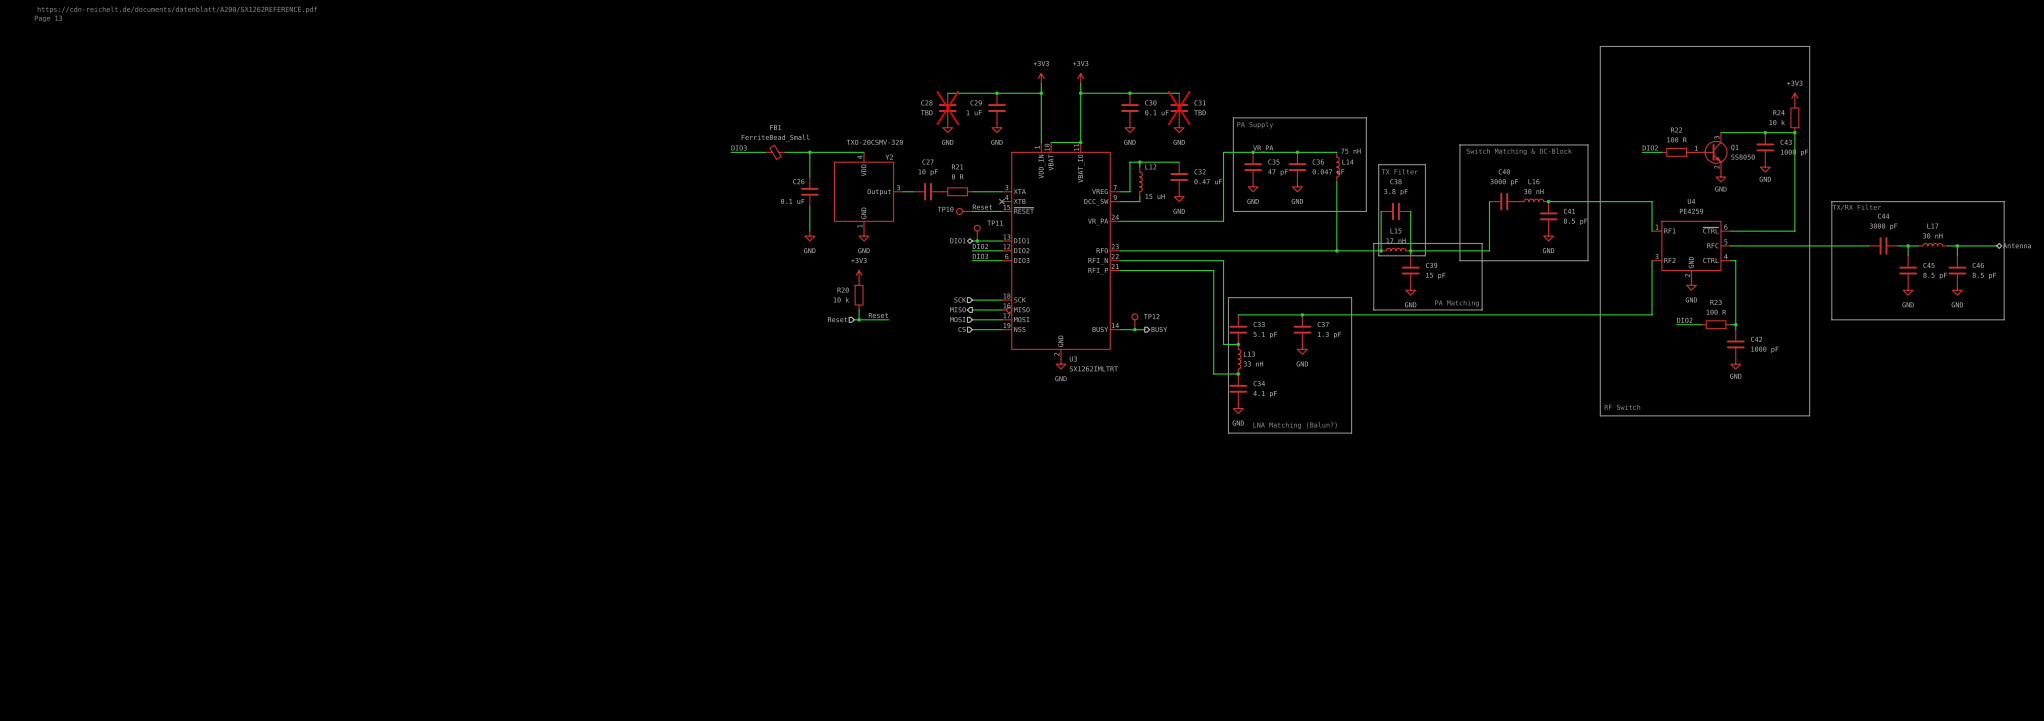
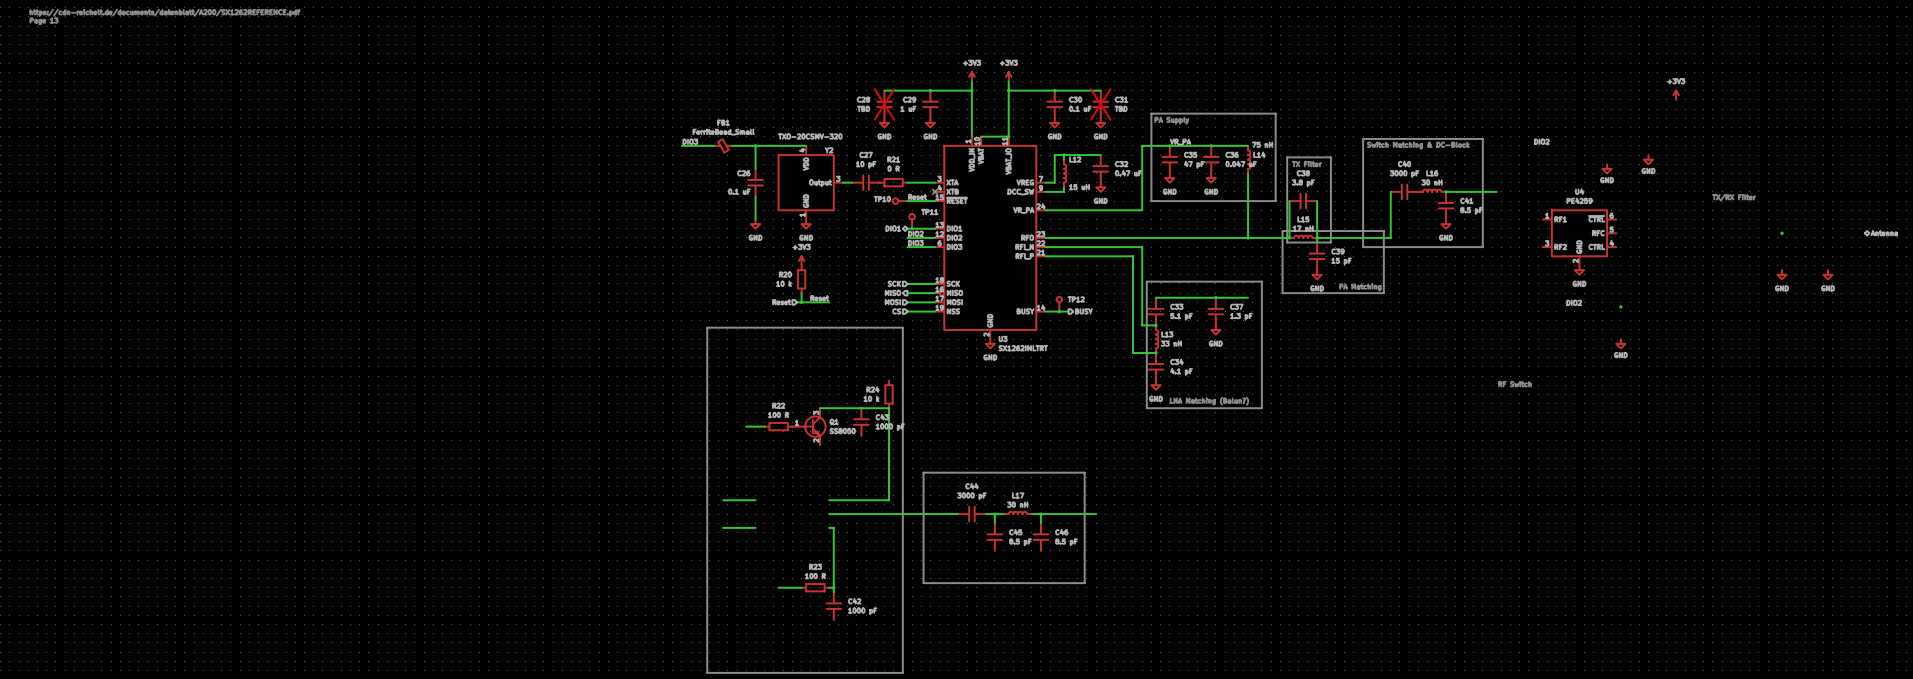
line: (1600, 46) (1809, 46) (1809, 415) (1600, 415) (1600, 46) -> none
part position: (1794, 117) -> (889, 394)
wire: (1720, 132) (1794, 132) (1794, 231) (1730, 231) -> none
junction: (1765, 132) -> none
junction: (1794, 132) -> none
part position: (1765, 147) -> (861, 422)
wire: (1642, 152) (1661, 152) -> none
part position: (1676, 152) -> (778, 426)
part position: (1709, 152) -> (809, 426)
wire: (1602, 201) (1652, 201) (1652, 231) -> none
line: (1831, 201) (2004, 201) (2004, 319) (1831, 319) (1831, 201) -> none
part position: (1932, 244) -> (1017, 512)
wire: (1730, 245) (1868, 245) -> none
part position: (1883, 245) -> (971, 514)
wire: (1898, 245) (1917, 245) -> none
wire: (1908, 245) (1908, 255) -> none
wire: (1947, 245) (1996, 245) -> none
wire: (1957, 245) (1957, 255) -> none
junction: (1957, 245) -> none
wire: (1652, 260) (1652, 314) (1336, 314) -> none
wire: (1730, 260) (1735, 260) (1735, 329) -> none
part position: (1908, 270) -> (994, 537)
part position: (1957, 270) -> (1040, 537)
wire: (1676, 324) (1701, 324) -> none
part position: (1716, 324) -> (815, 587)
wire: (1730, 324) (1735, 324) -> none
part position: (1735, 344) -> (833, 606)
line: none -> (707, 327) (902, 327) (902, 672) (707, 672) (707, 327)
wire: none -> (819, 408) (889, 408) (889, 500) (829, 500)
wire: none -> (746, 426) (764, 426)
line: none -> (923, 472) (1084, 472) (1084, 583) (923, 583) (923, 472)
wire: none -> (723, 500) (755, 500)
wire: none -> (829, 514) (958, 514)
wire: none -> (985, 514) (1004, 514)
wire: none -> (994, 514) (994, 523)
wire: none -> (1031, 514) (1096, 514)
wire: none -> (1040, 514) (1040, 523)
wire: none -> (723, 527) (755, 527)
wire: none -> (829, 527) (833, 527) (833, 592)
wire: none -> (778, 587) (801, 587)
wire: none -> (829, 587) (833, 587)

